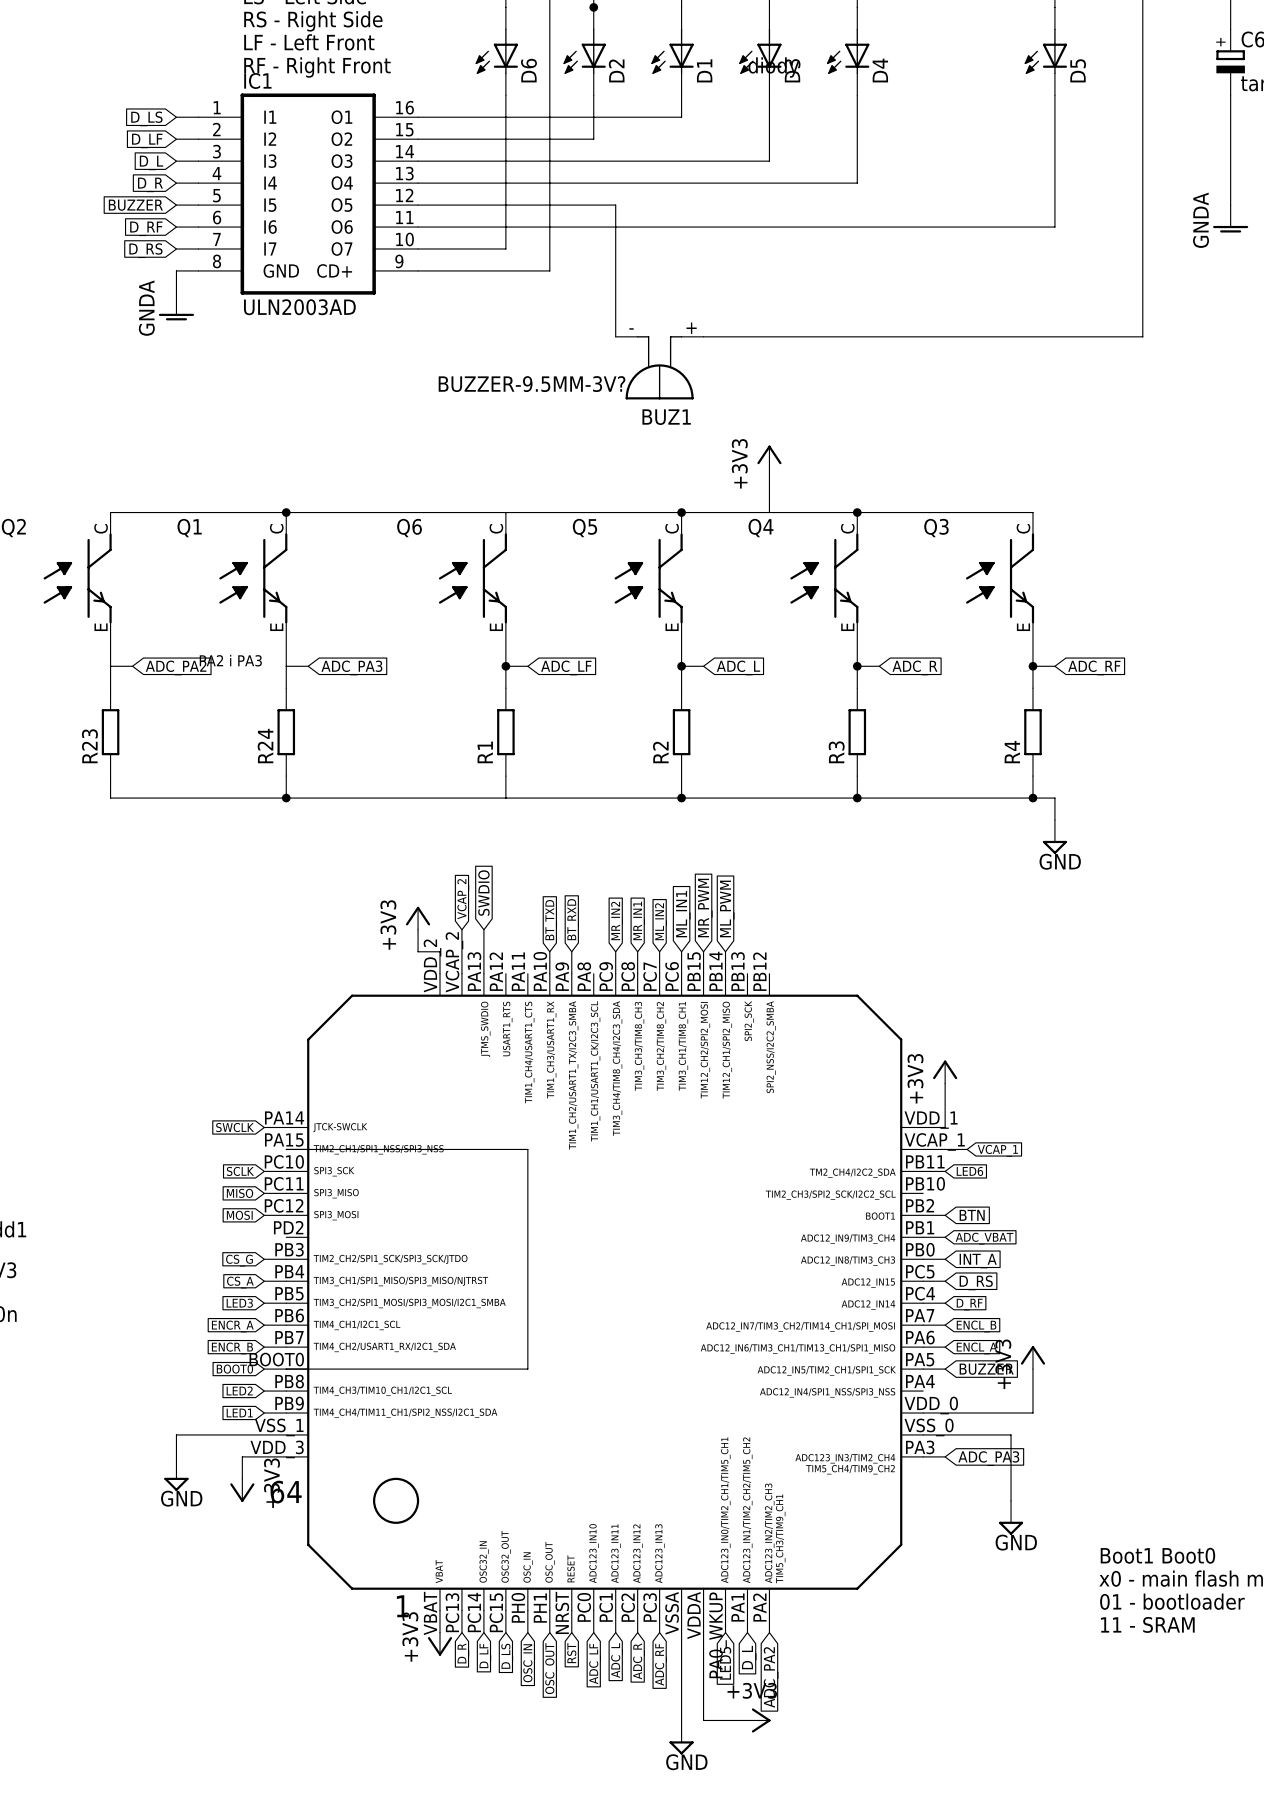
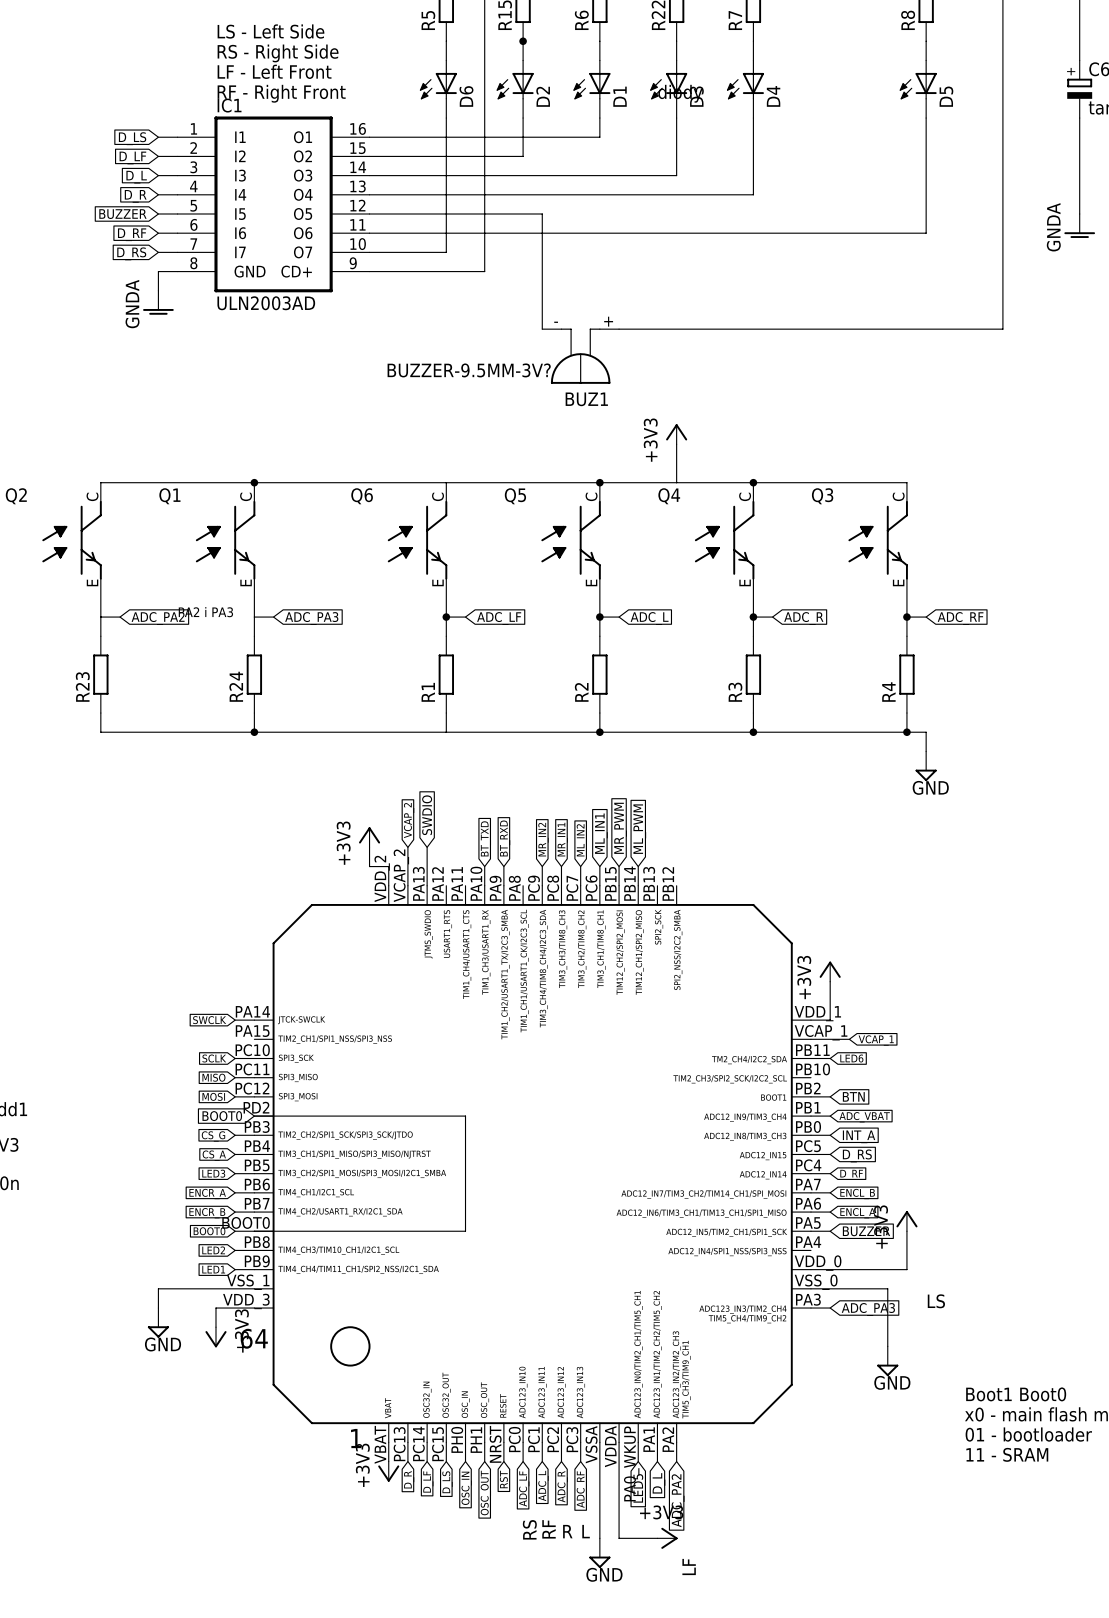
wire: (286, 1149) (527, 1149) (527, 1237) -> (254, 1116) (465, 1116)
global label: none -> BOOT0 (222, 1116)
text: none -> LS (936, 1301)
text: none -> RS (529, 1529)
text: none -> RF (549, 1529)
text: none -> R (567, 1531)
text: none -> L (586, 1531)
text: none -> LF (689, 1567)

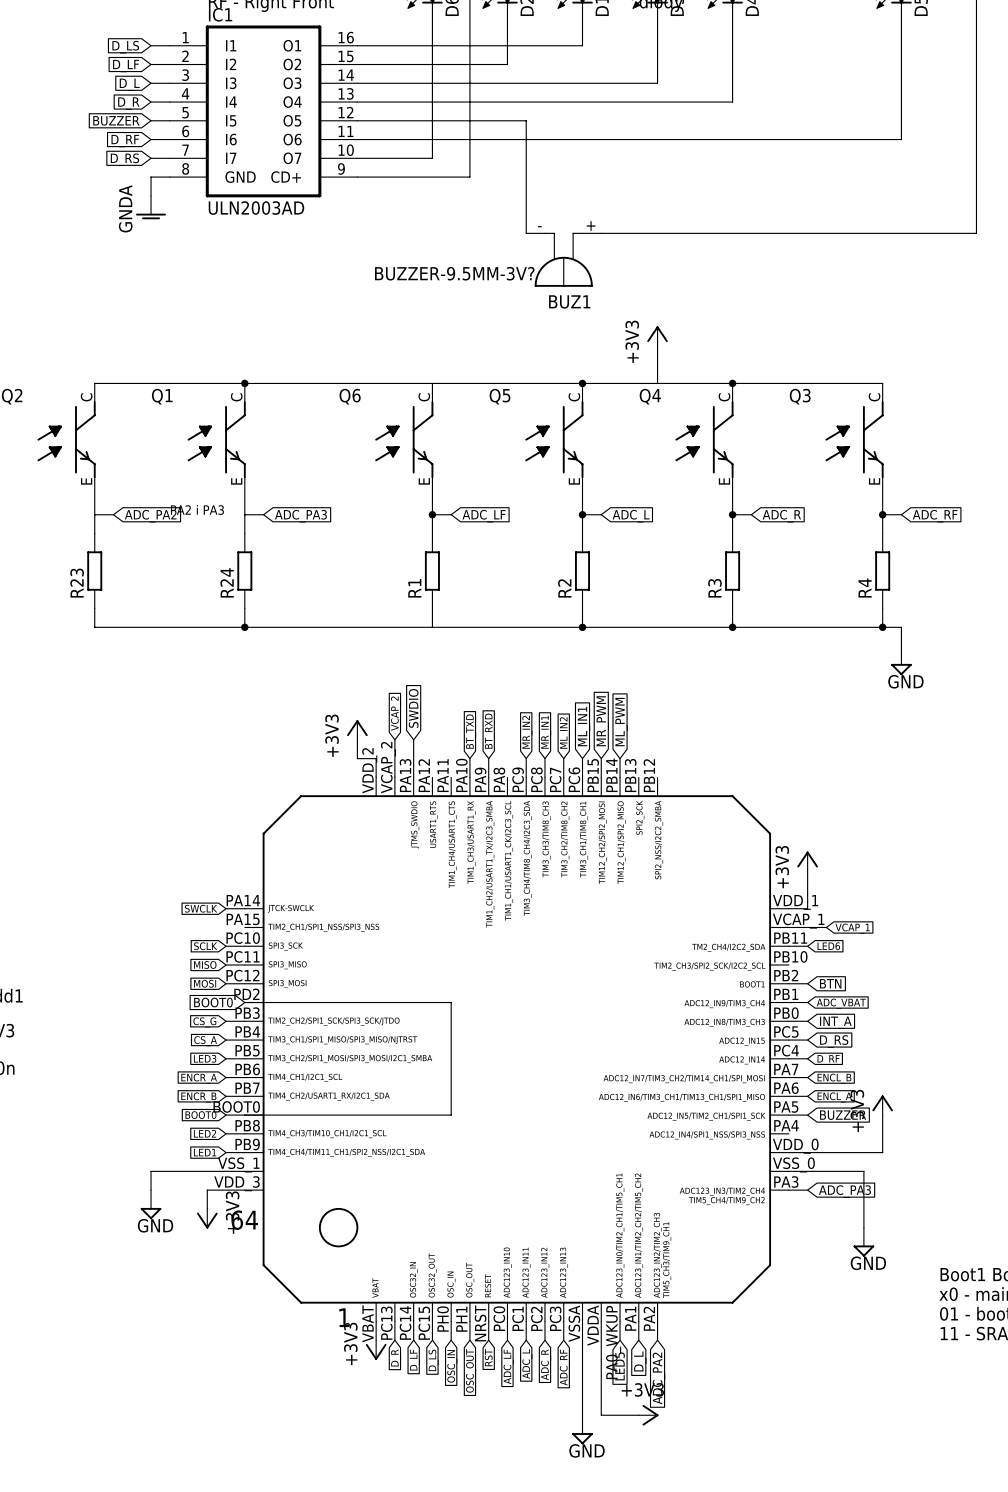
text: LS (936, 1301) -> none
text: RS (529, 1529) -> none
text: RF (549, 1529) -> none
text: R (567, 1531) -> none
text: L (586, 1531) -> none
text: LF (689, 1567) -> none

